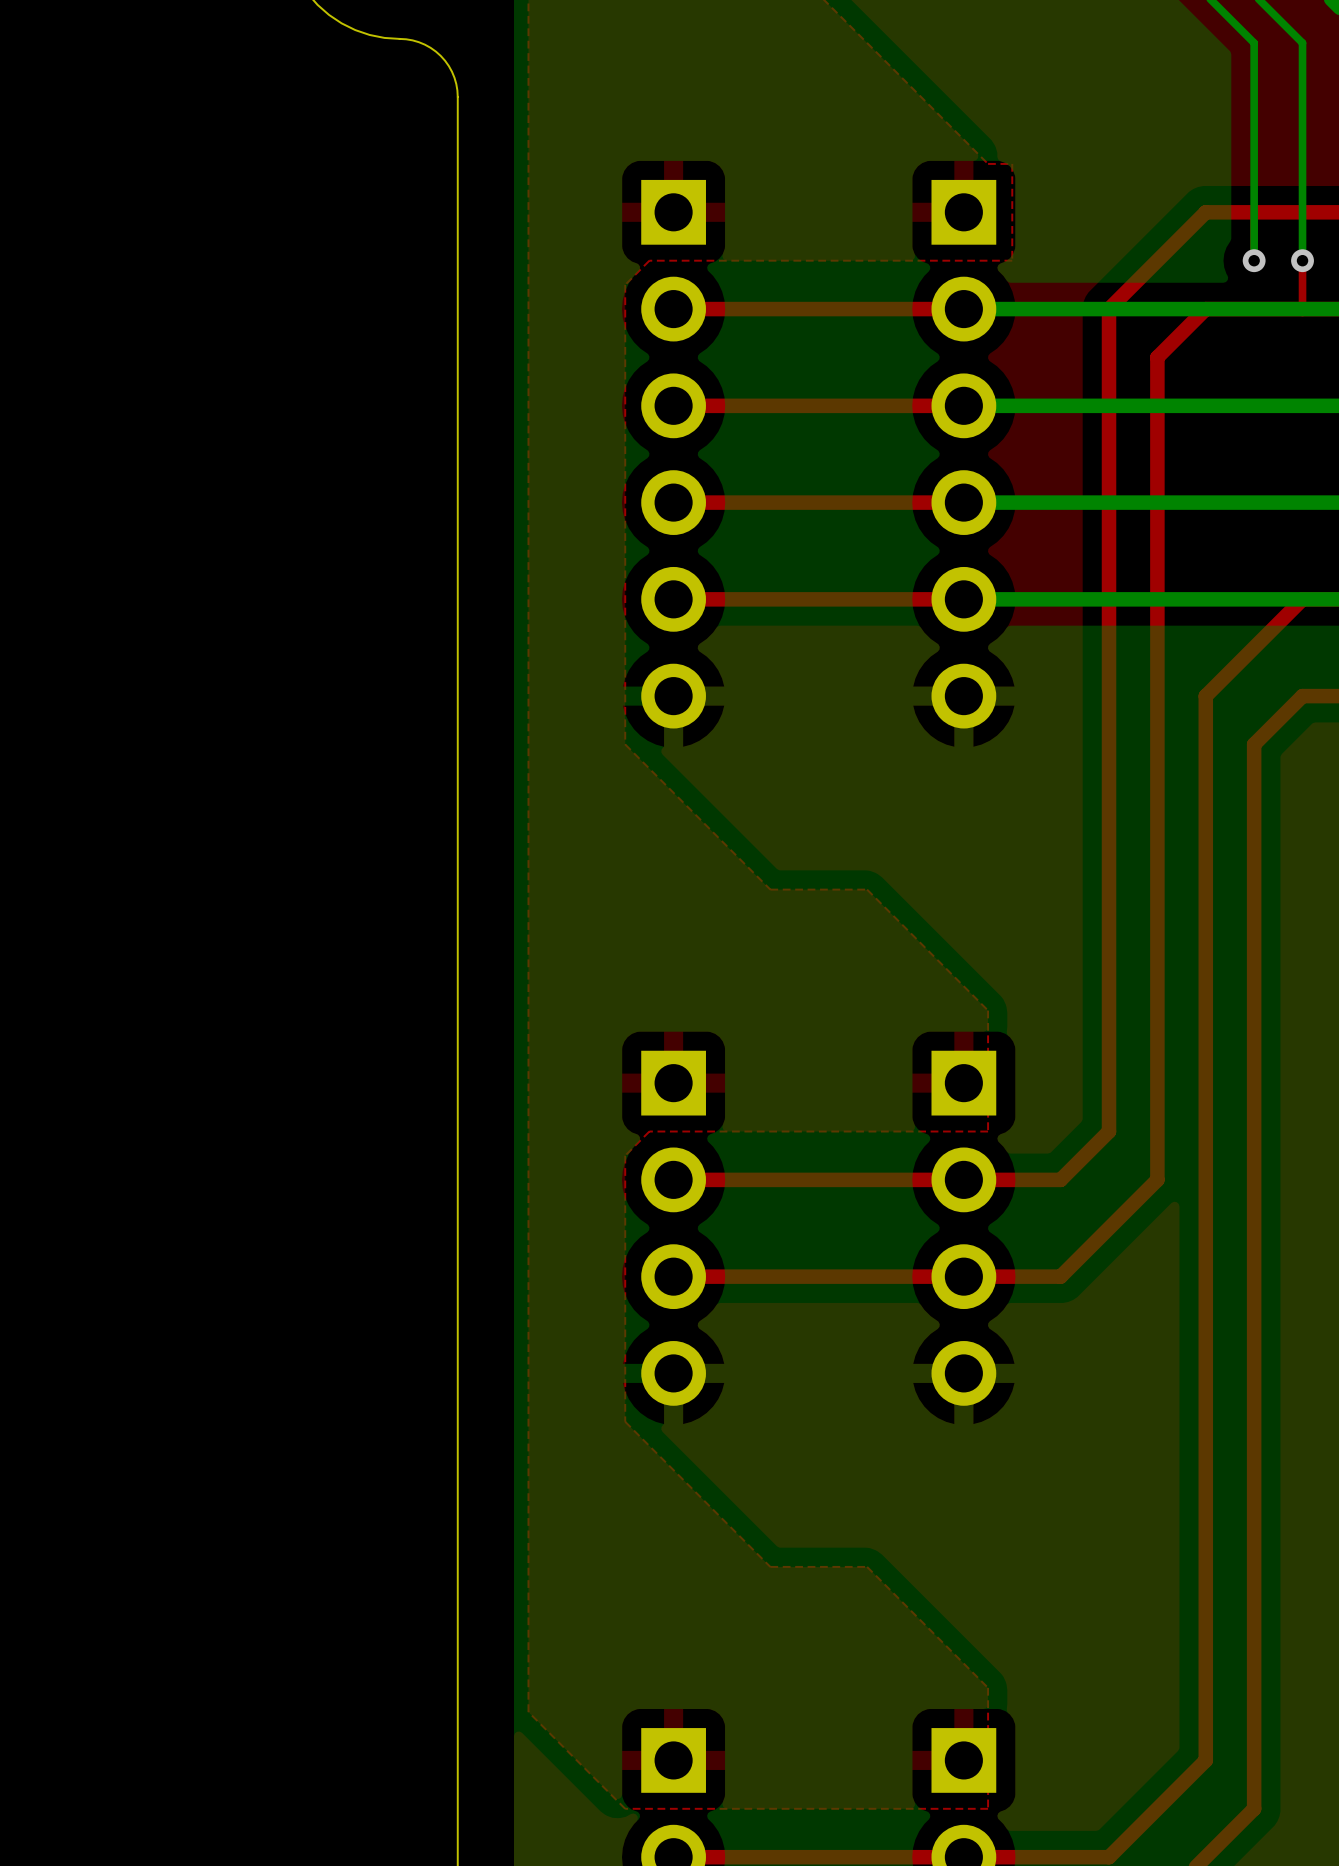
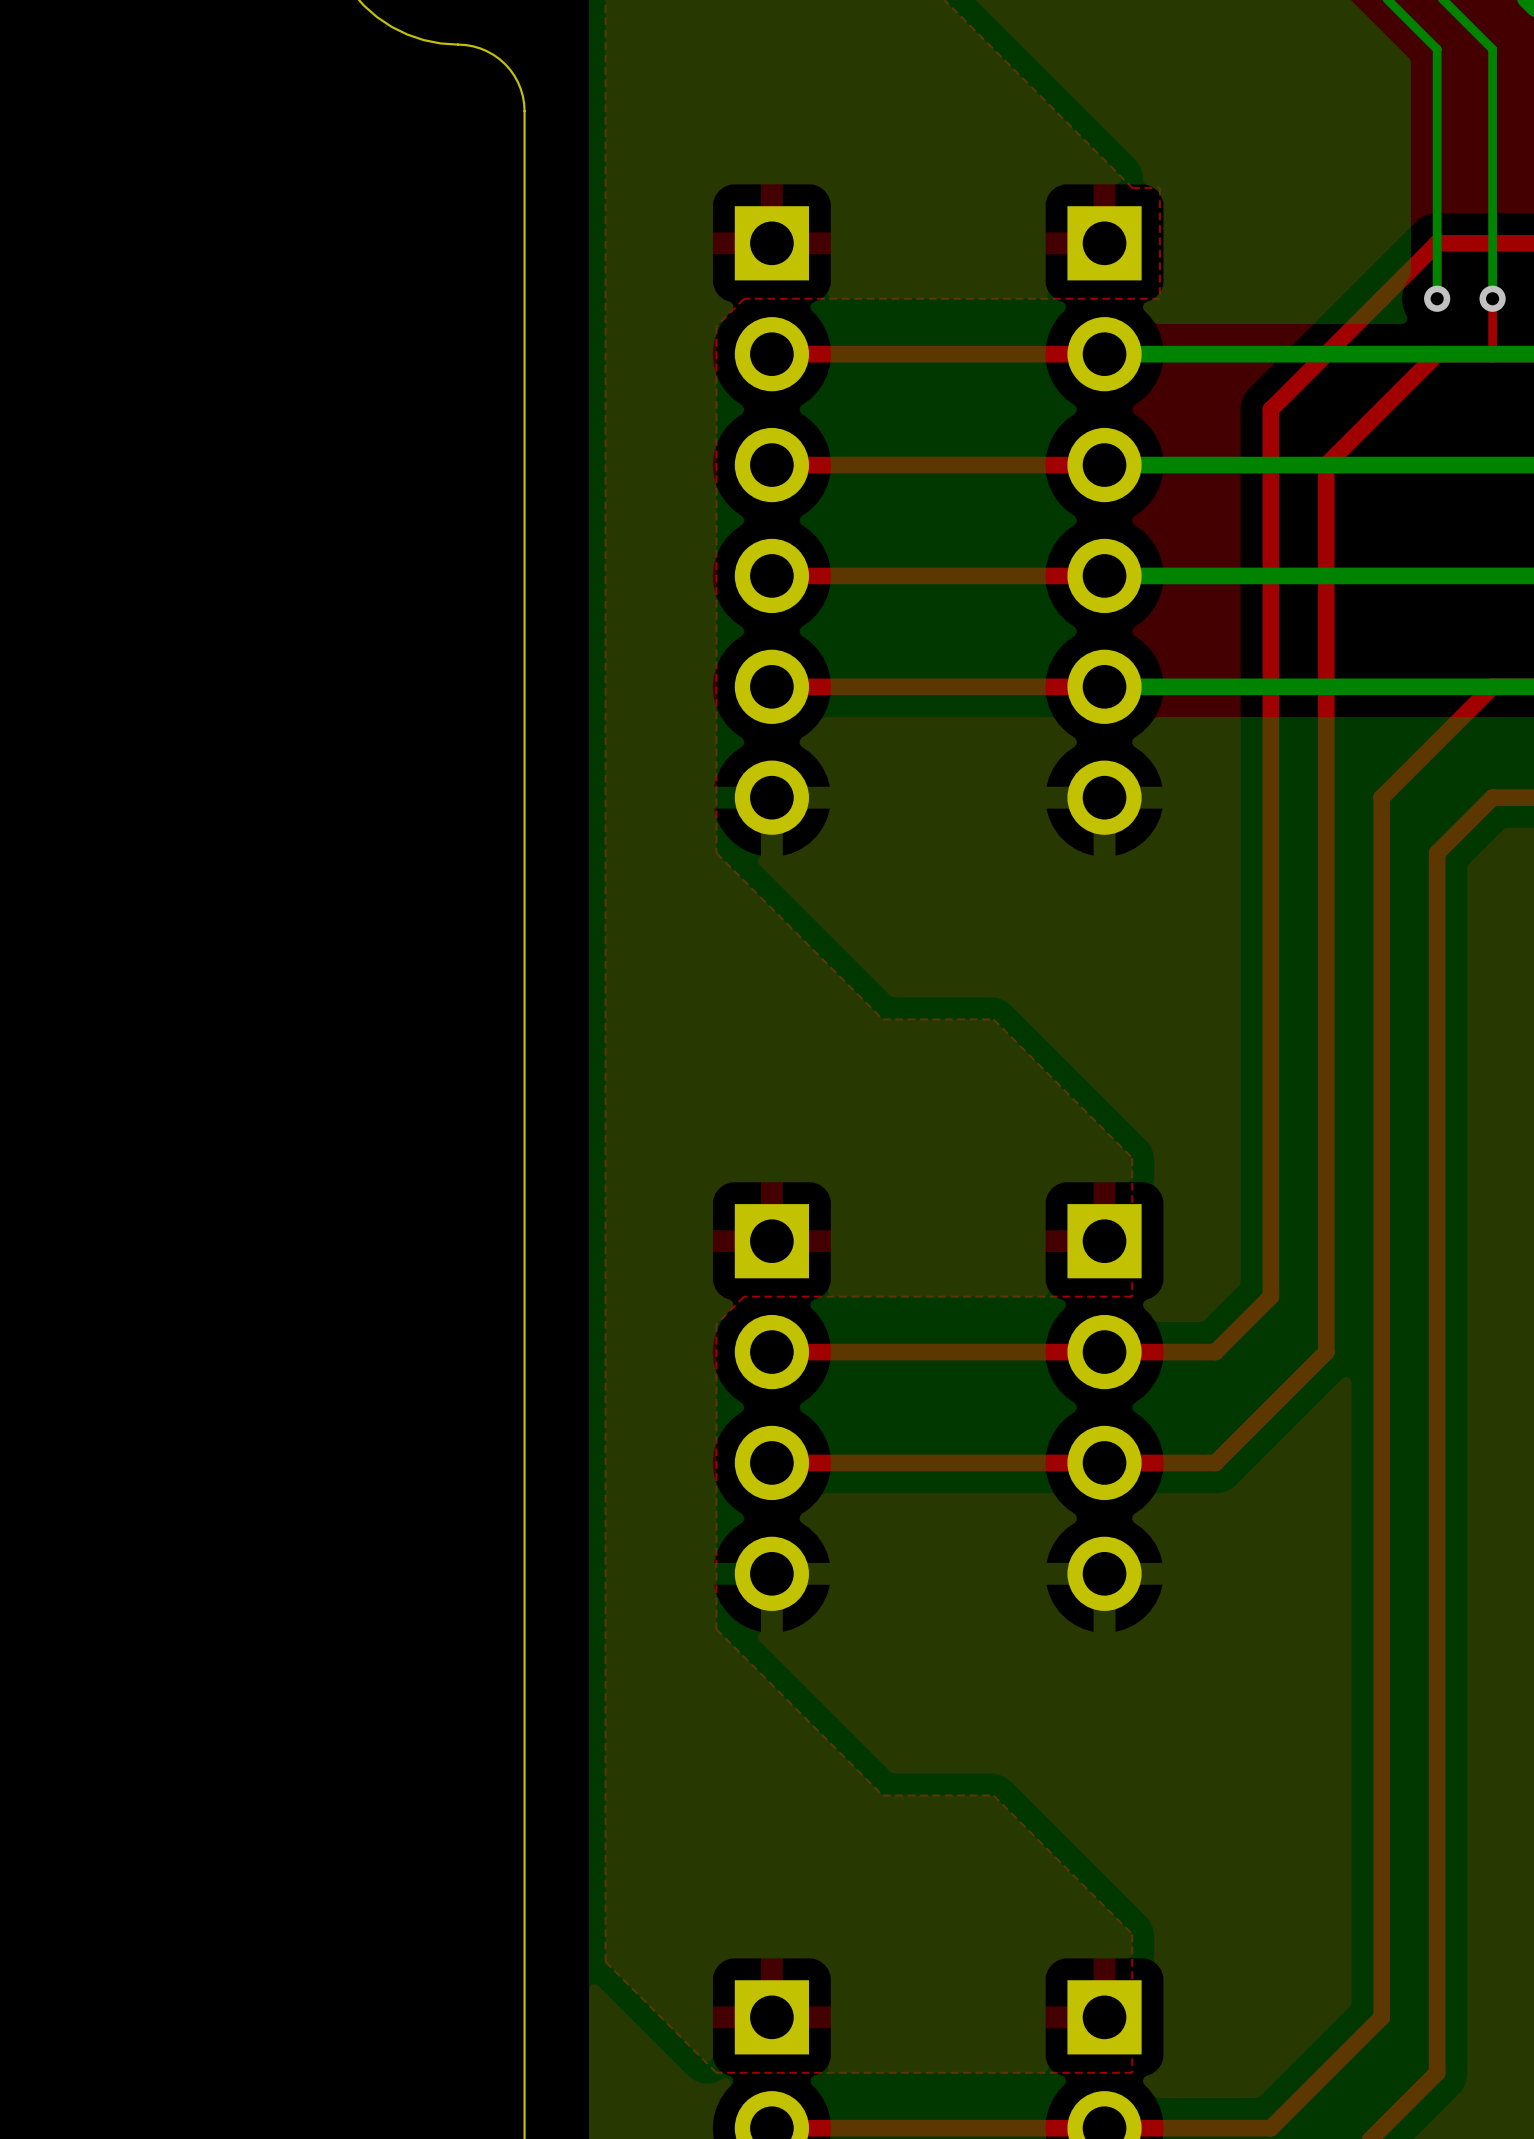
top track: (1254, 212) (1205, 212) (1109, 309) (1109, 357) -> (1437, 243) (1270, 409)
top track: (1254, 309) (1205, 309) (1157, 357) (1157, 405) -> (1437, 354) (1326, 465)

